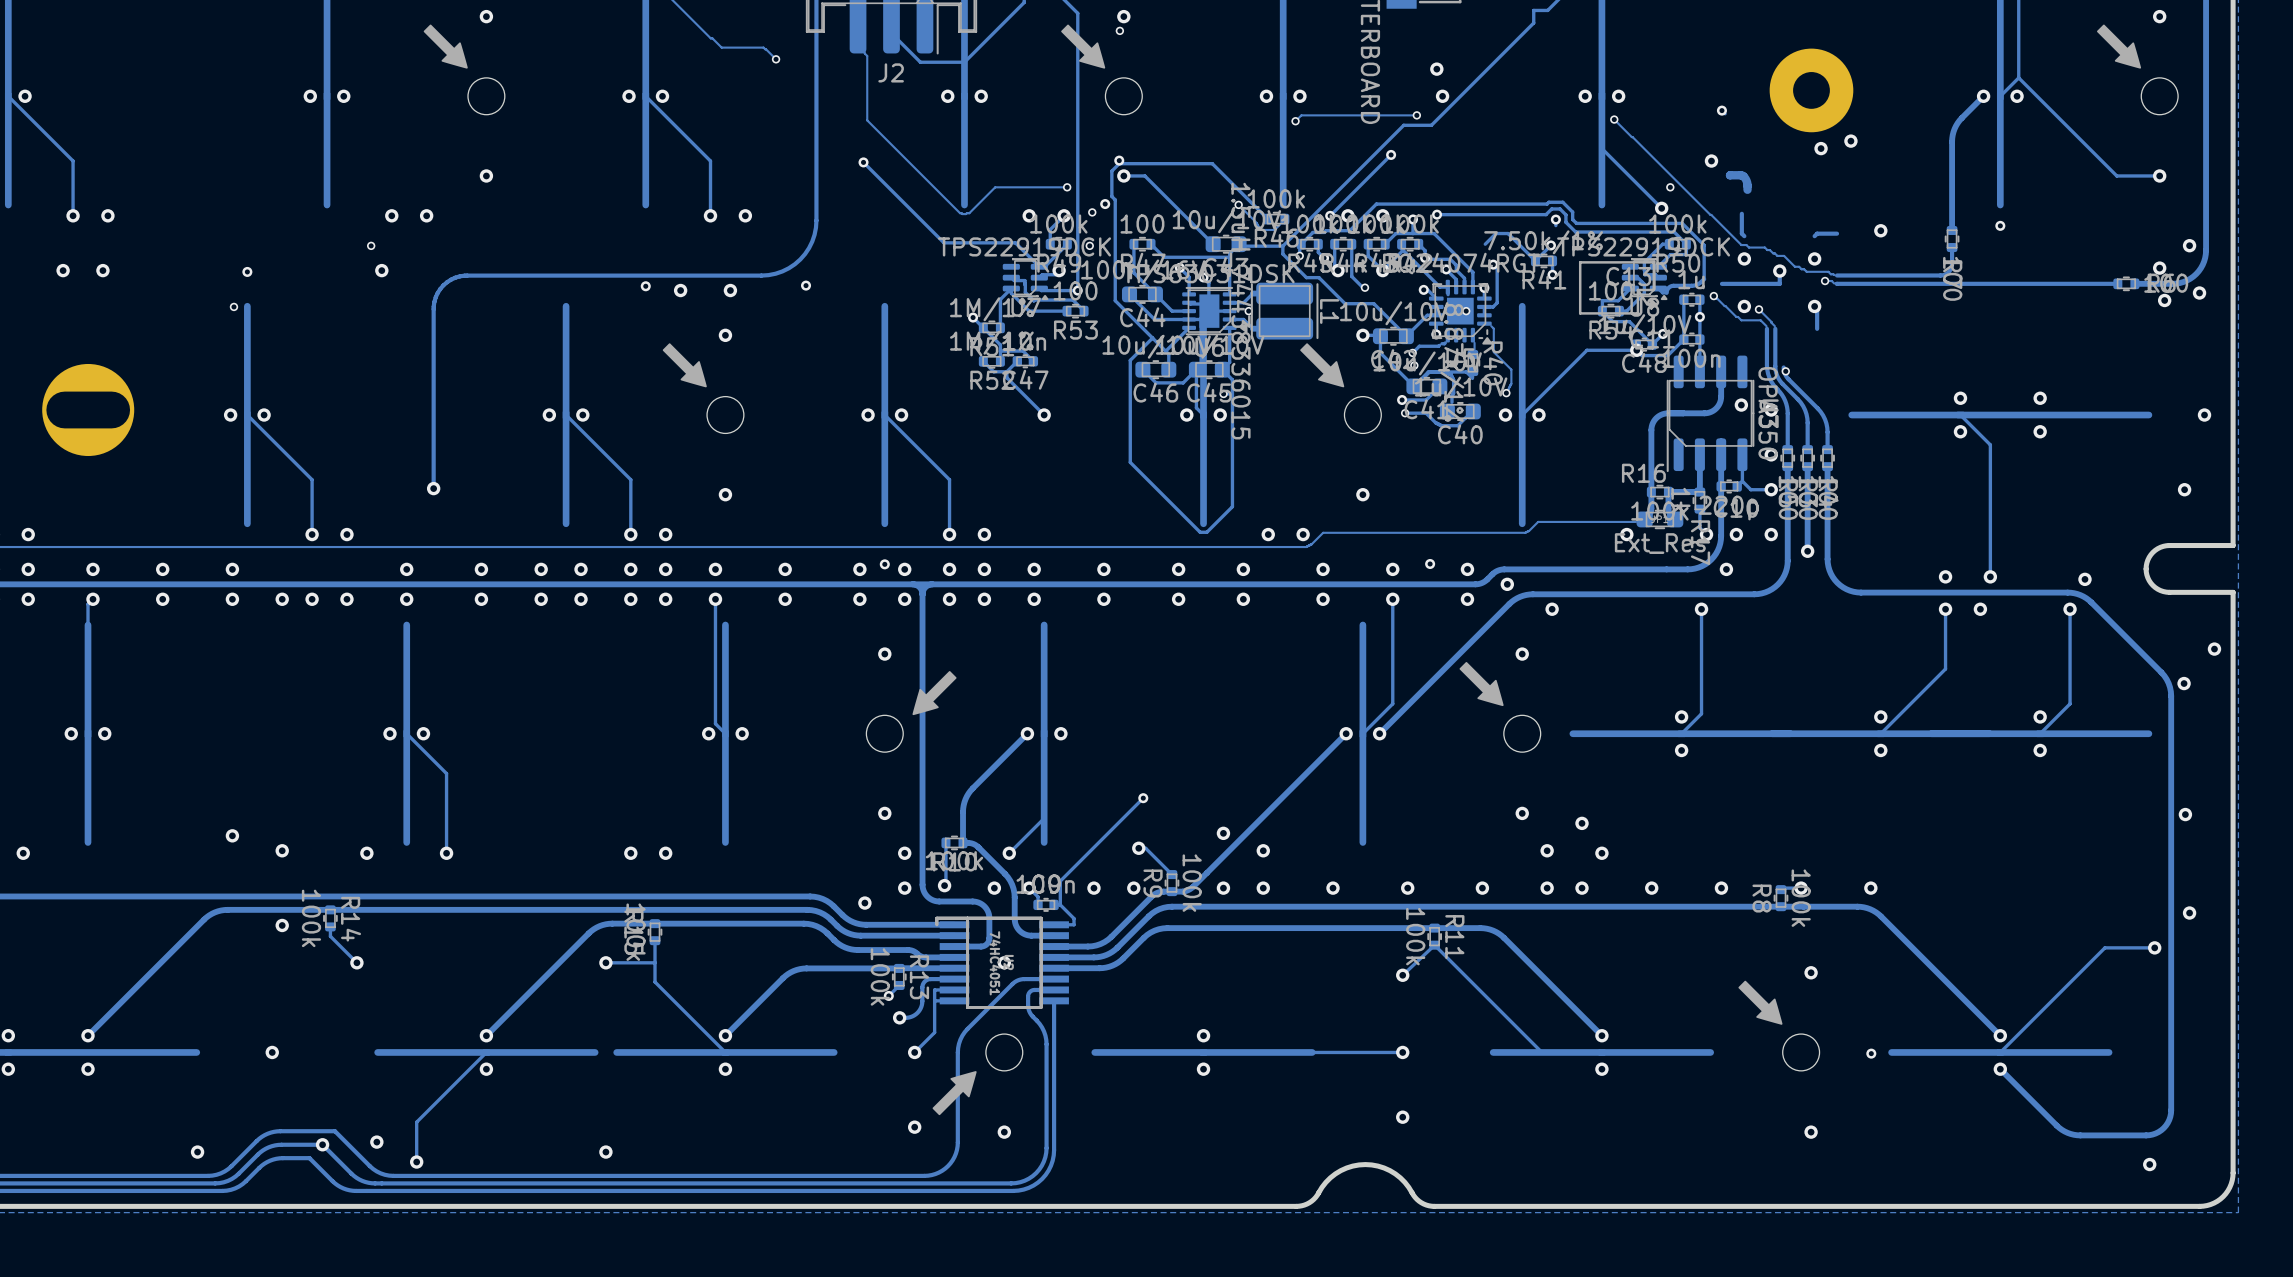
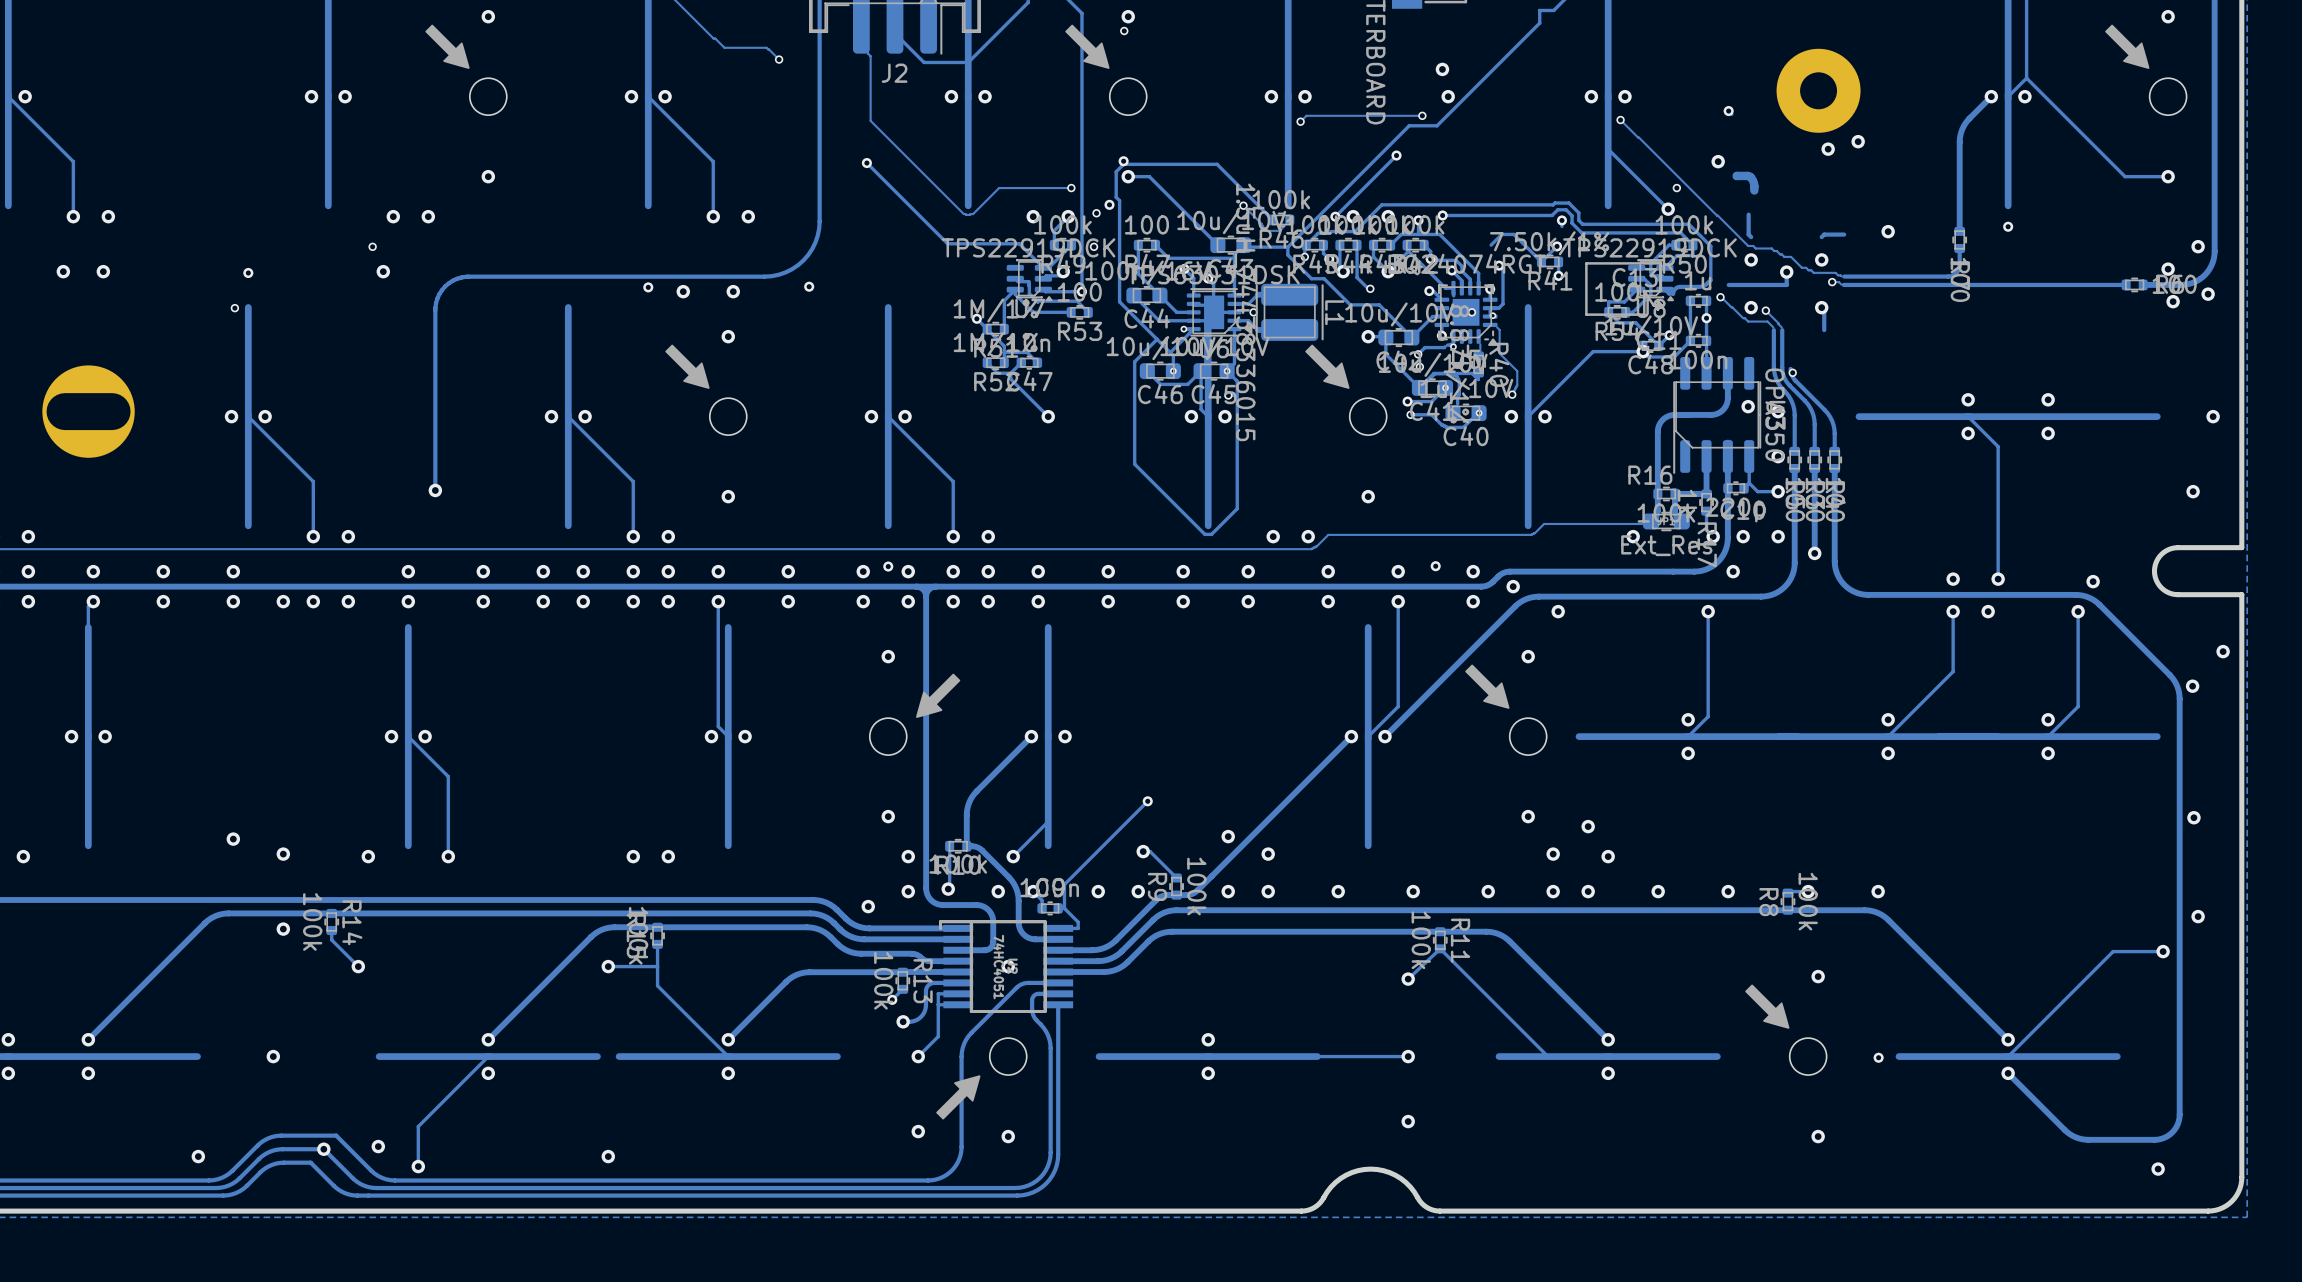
via: none -> (1492, 315)
via: none -> (1183, 329)
via: none -> (1453, 346)
via: none -> (1173, 371)
via: none -> (1227, 371)
via: none -> (1445, 387)
via: none -> (1479, 413)

